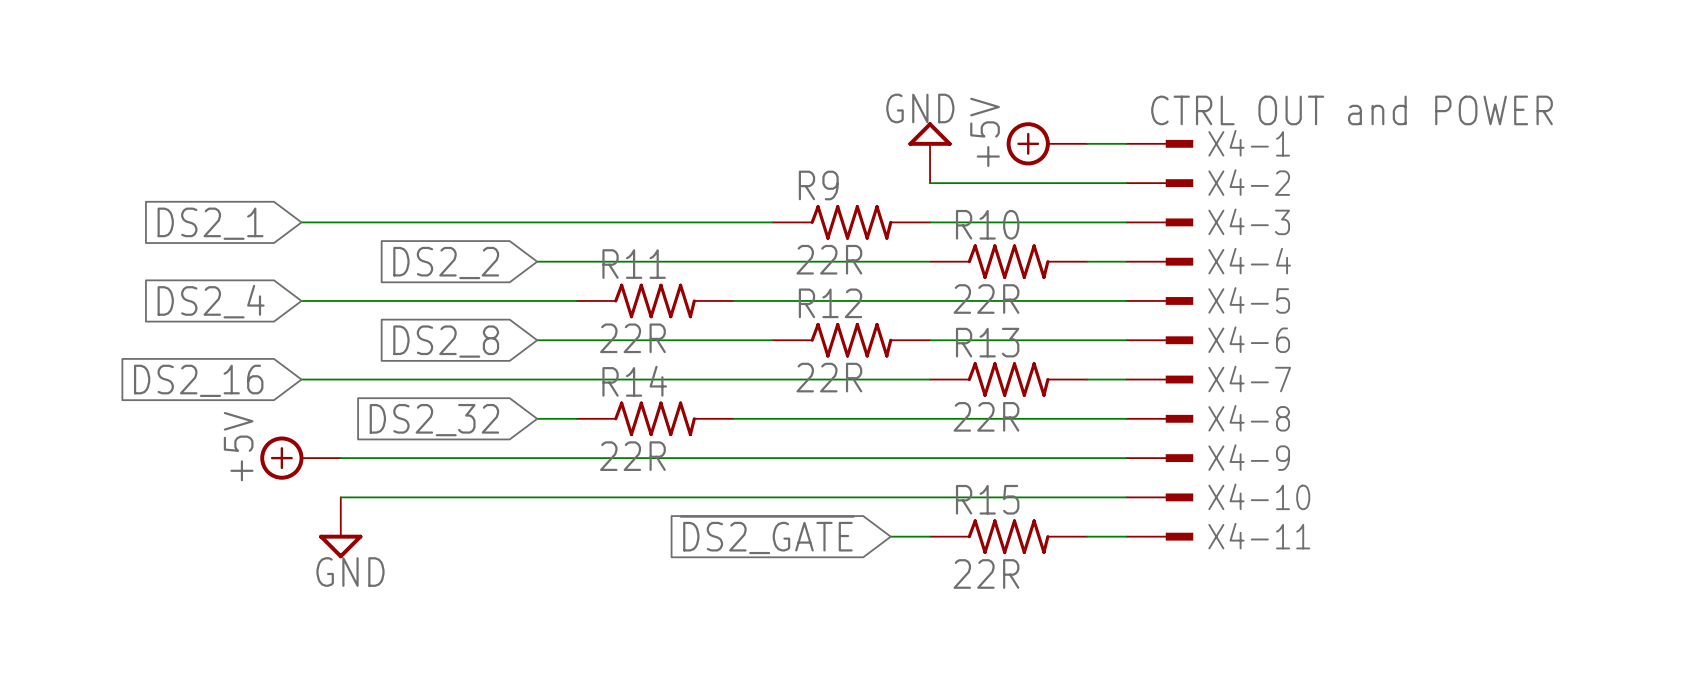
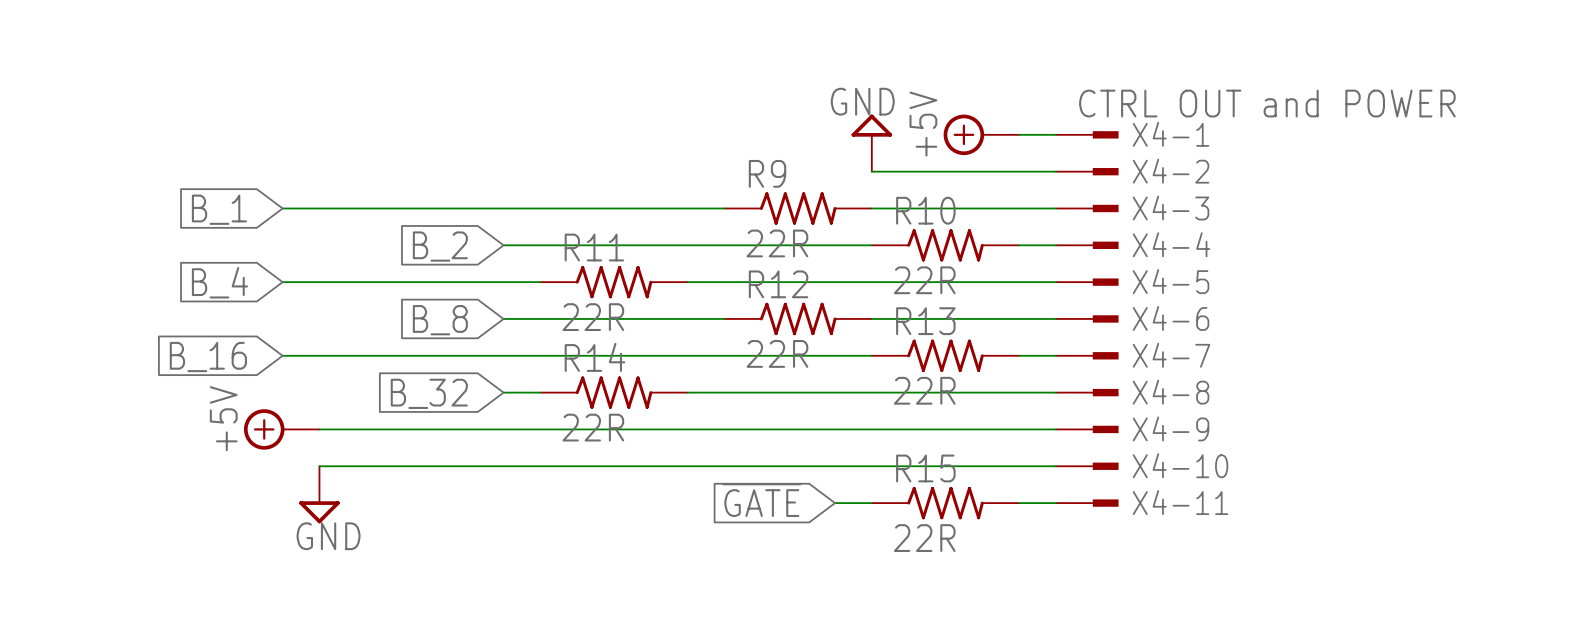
global label: DS2_1 (210, 223) -> B_1 (219, 209)
global label: DS2_2 (446, 263) -> B_2 (440, 246)
global label: DS2_4 (211, 301) -> B_4 (219, 282)
global label: DS2_8 (446, 341) -> B_8 (440, 320)
global label: DS2_16 (198, 380) -> B_16 (208, 357)
global label: DS2_32 (434, 420) -> B_32 (429, 393)
global label: ~{DS2_GATE} (767, 534) -> ~{GATE} (761, 500)

